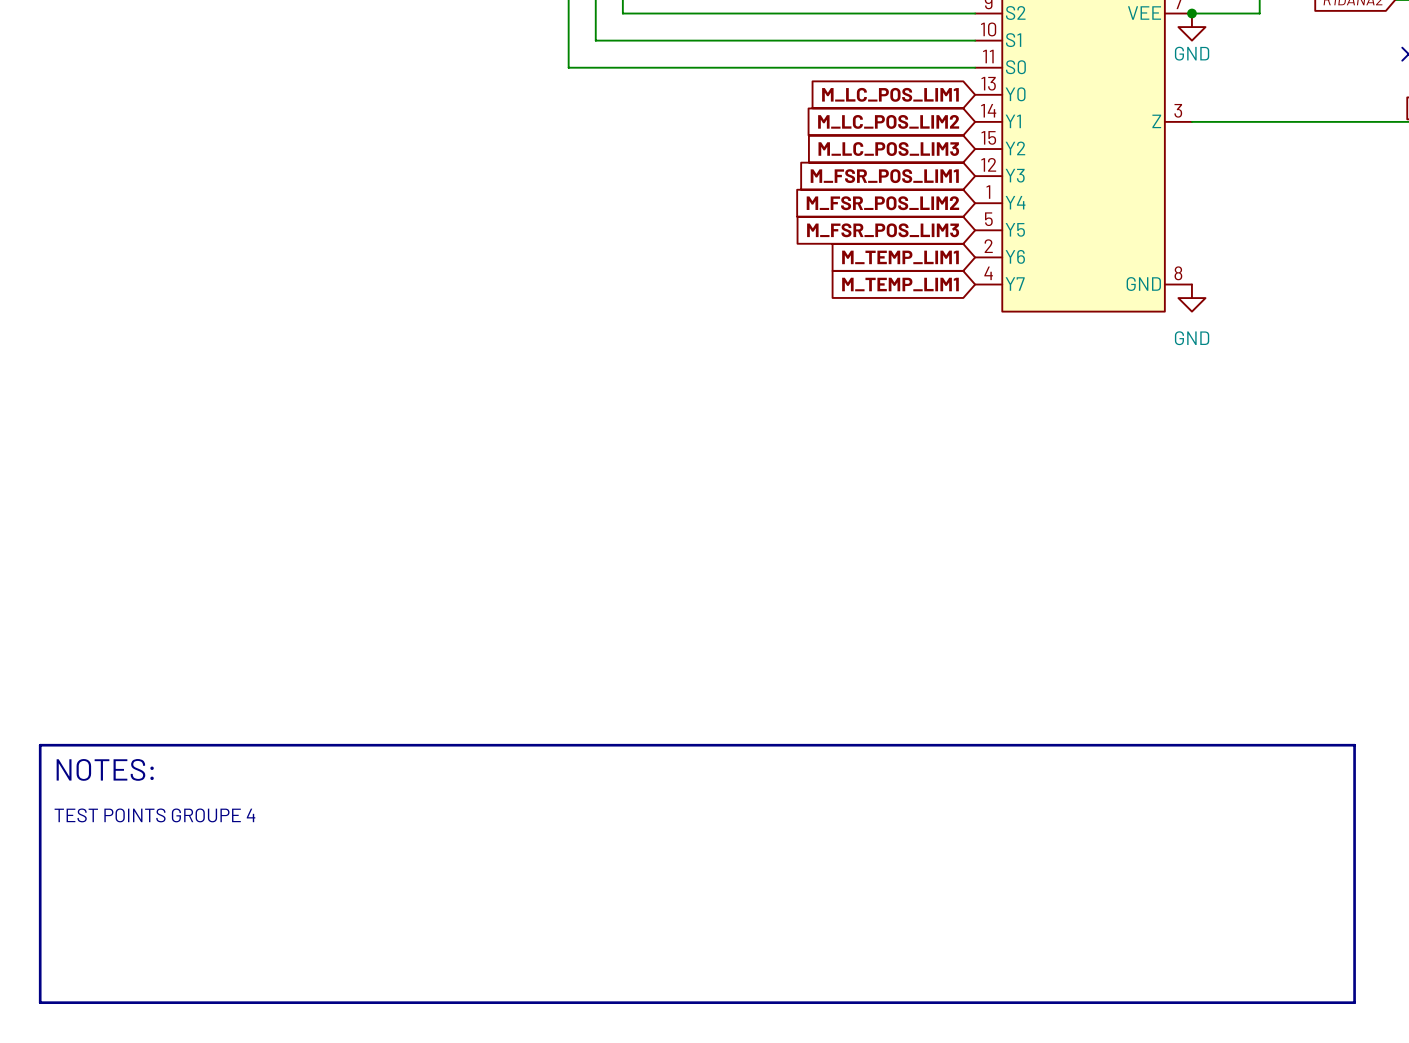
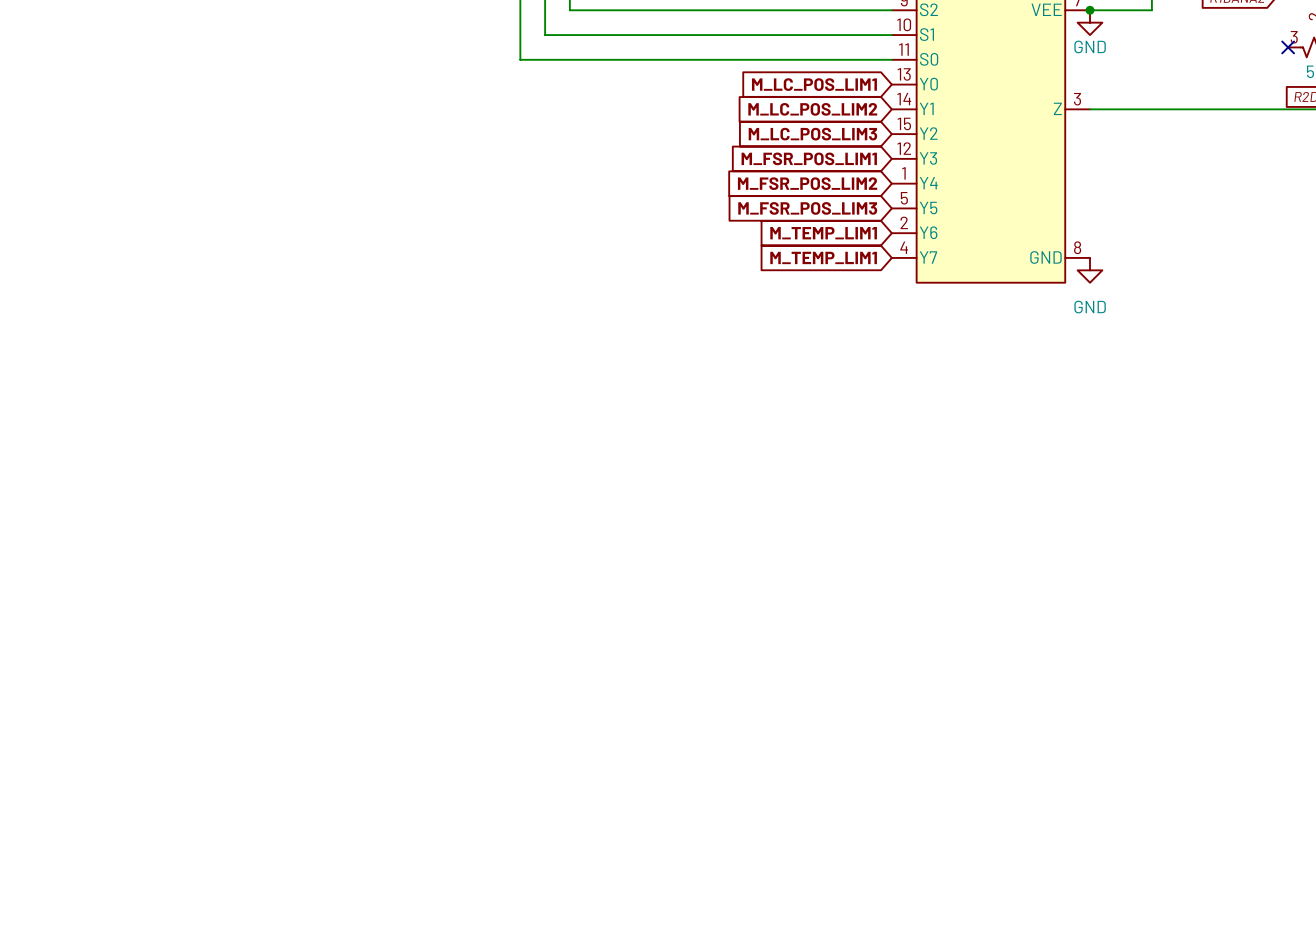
line: (40, 745) (40, 1002) (1354, 1002) (1354, 745) (40, 745) -> none
text: NOTES: (105, 769) -> none
text: TEST POINTS GROUPE 4 (154, 815) -> none

